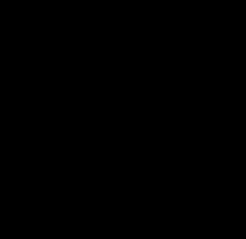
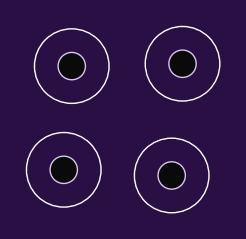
part: none -> (182, 63)
part: none -> (71, 66)
part: none -> (63, 169)
part: none -> (171, 175)

